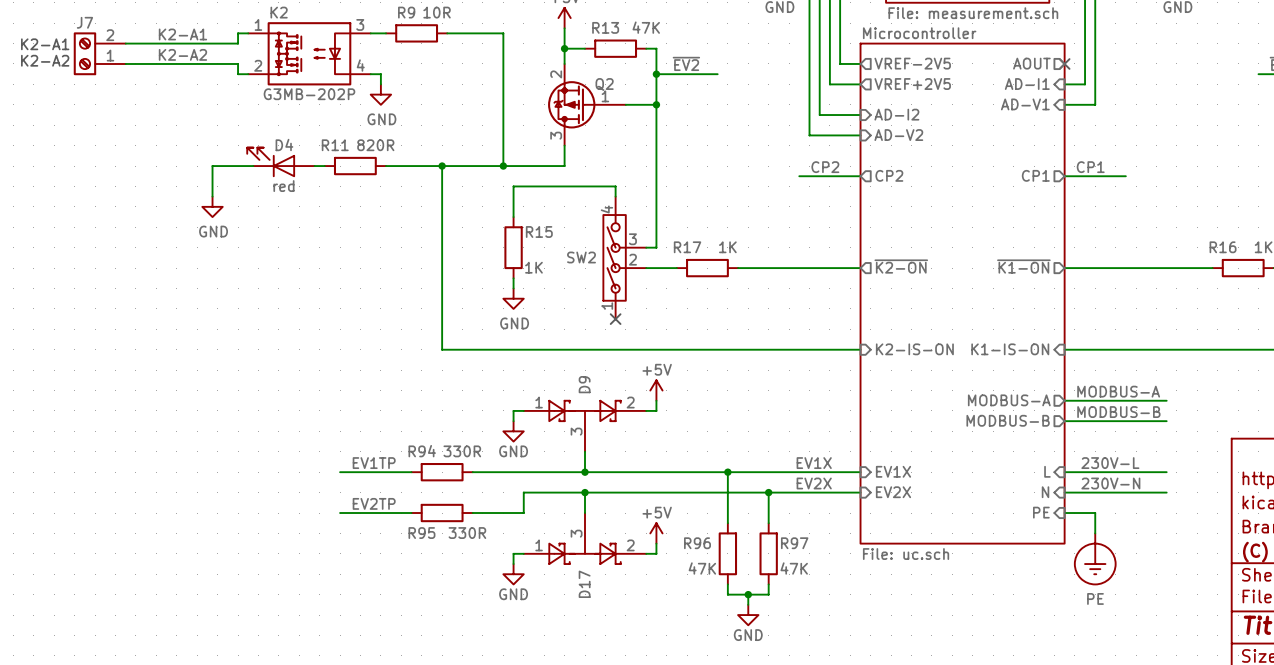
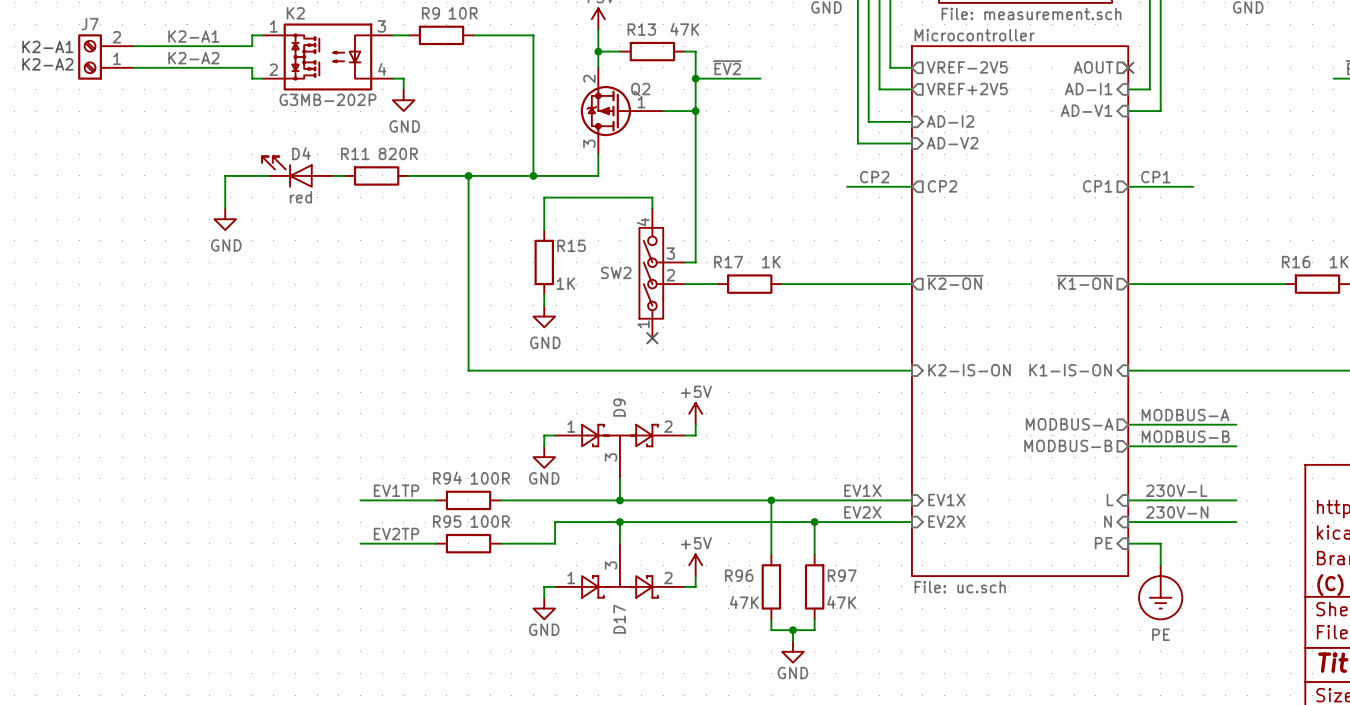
R94 value: 330R (462, 451) -> 100R (490, 478)
R95 name position: R95 (421, 533) -> R95 (447, 521)
R95 value: 330R (467, 533) -> 100R (490, 521)

